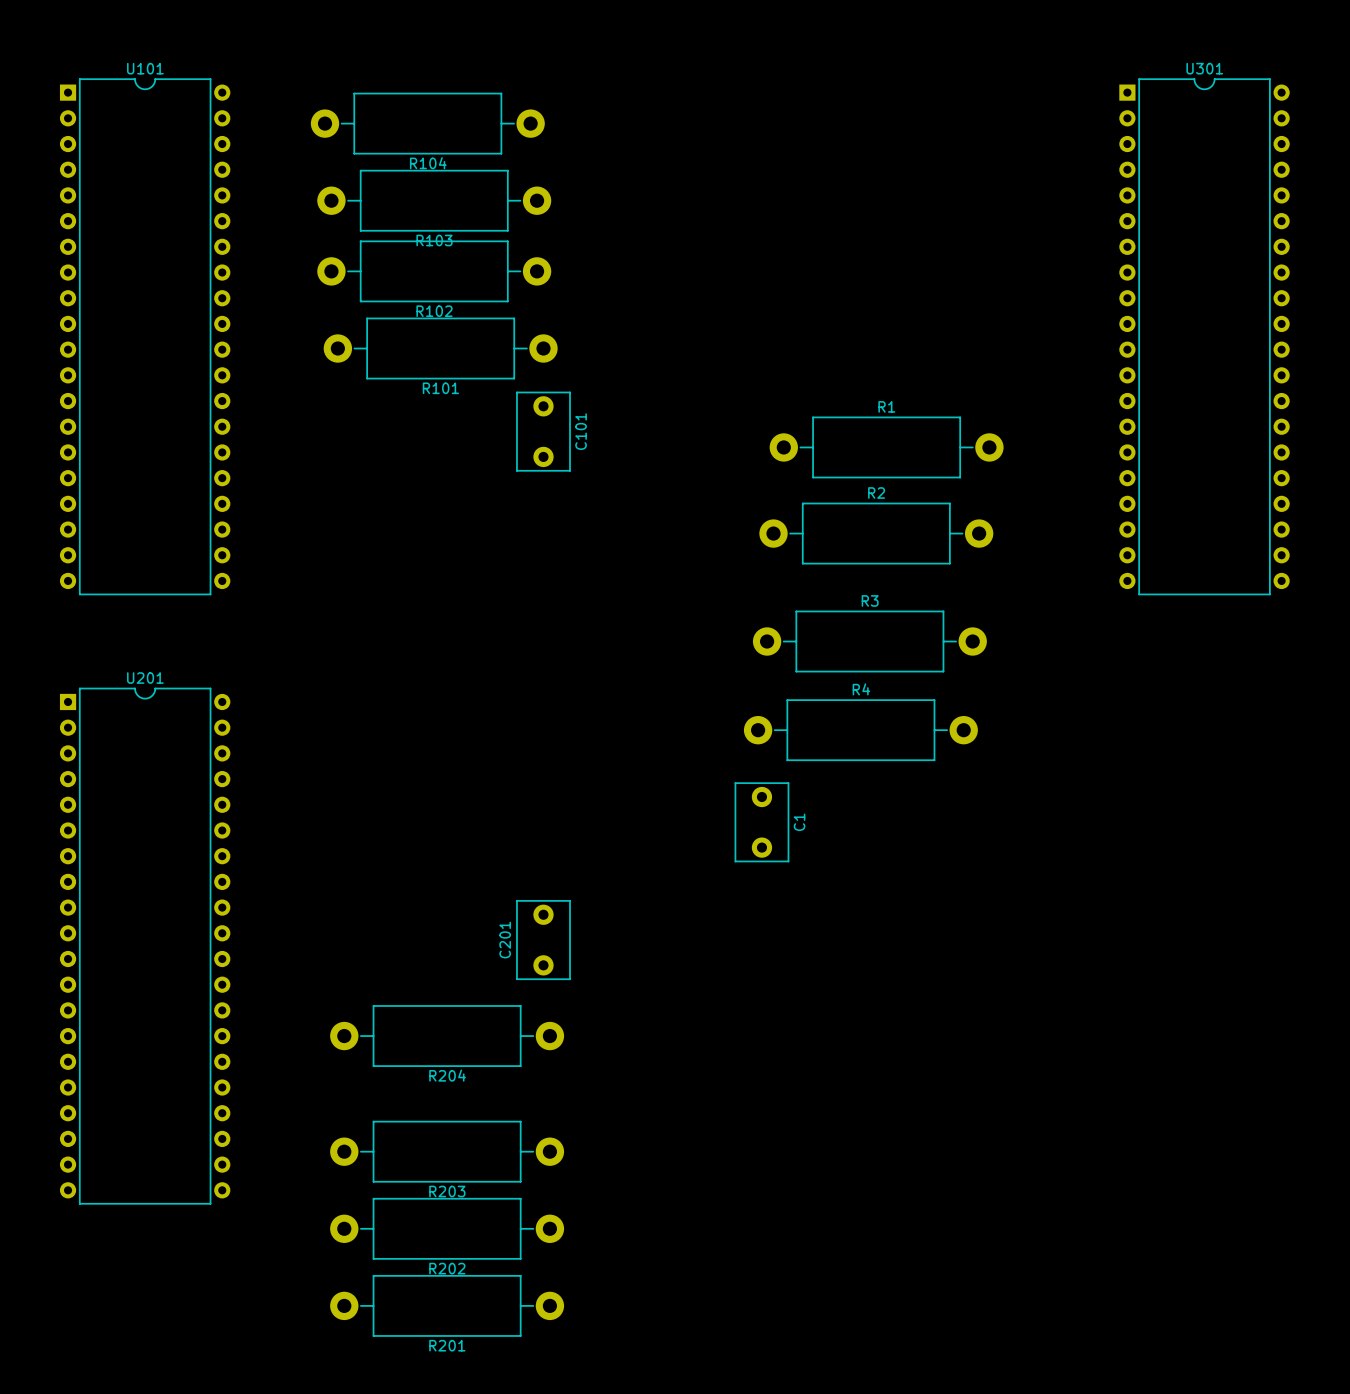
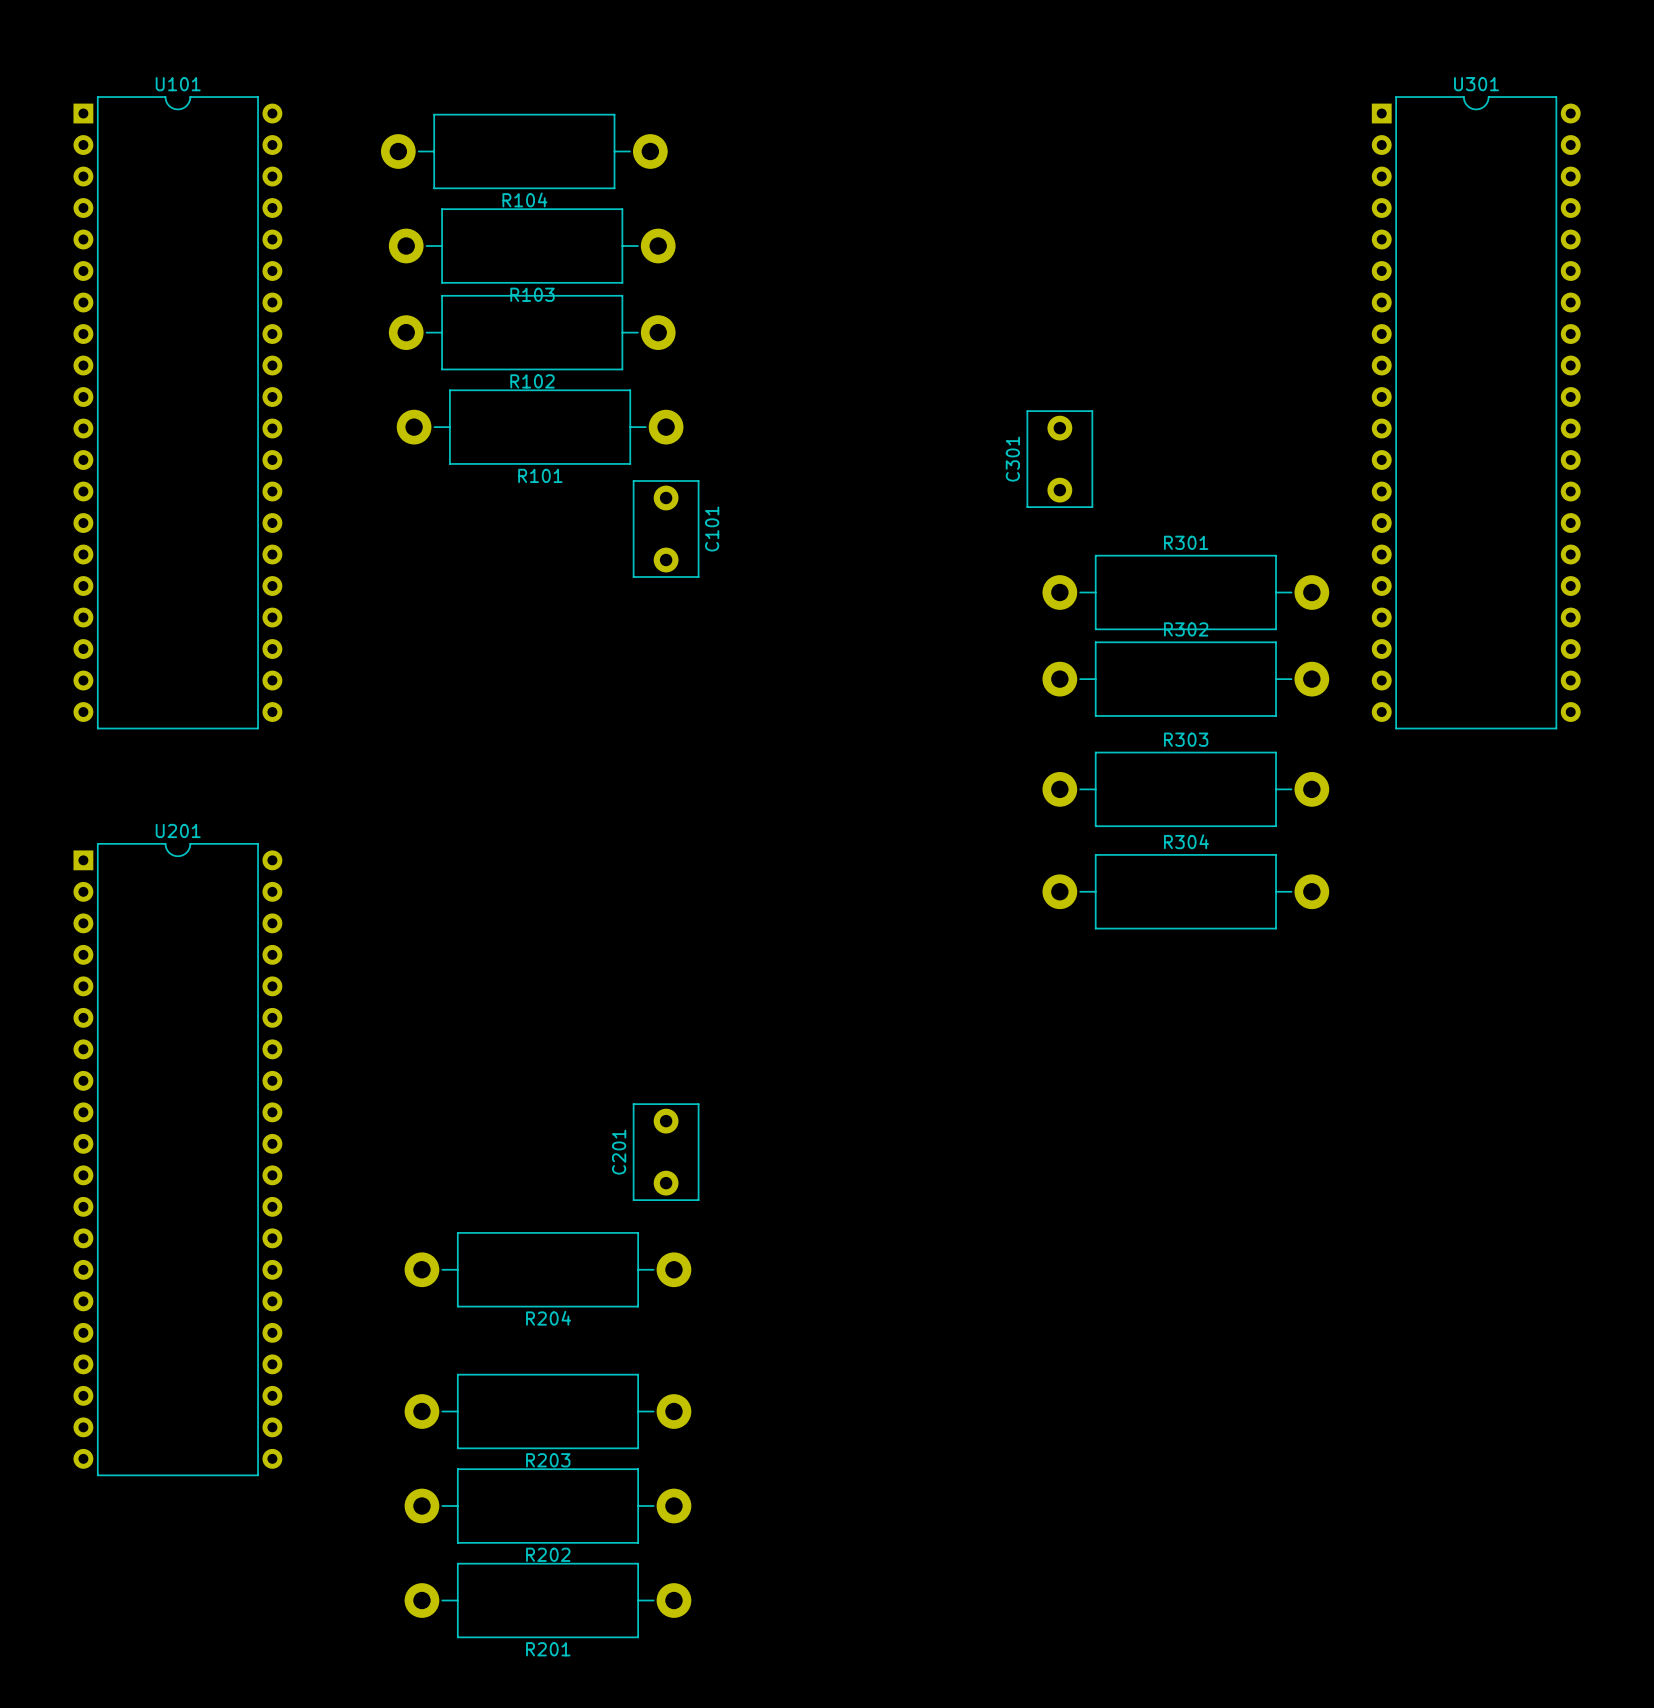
C301: none -> (1059, 459)
R1: (886, 447) -> none
R301: none -> (1185, 592)
R2: (876, 533) -> none
R302: none -> (1185, 679)
R3: (869, 641) -> none
R303: none -> (1185, 789)
R304: none -> (1185, 891)
R4: (860, 730) -> none
C1: (761, 822) -> none

